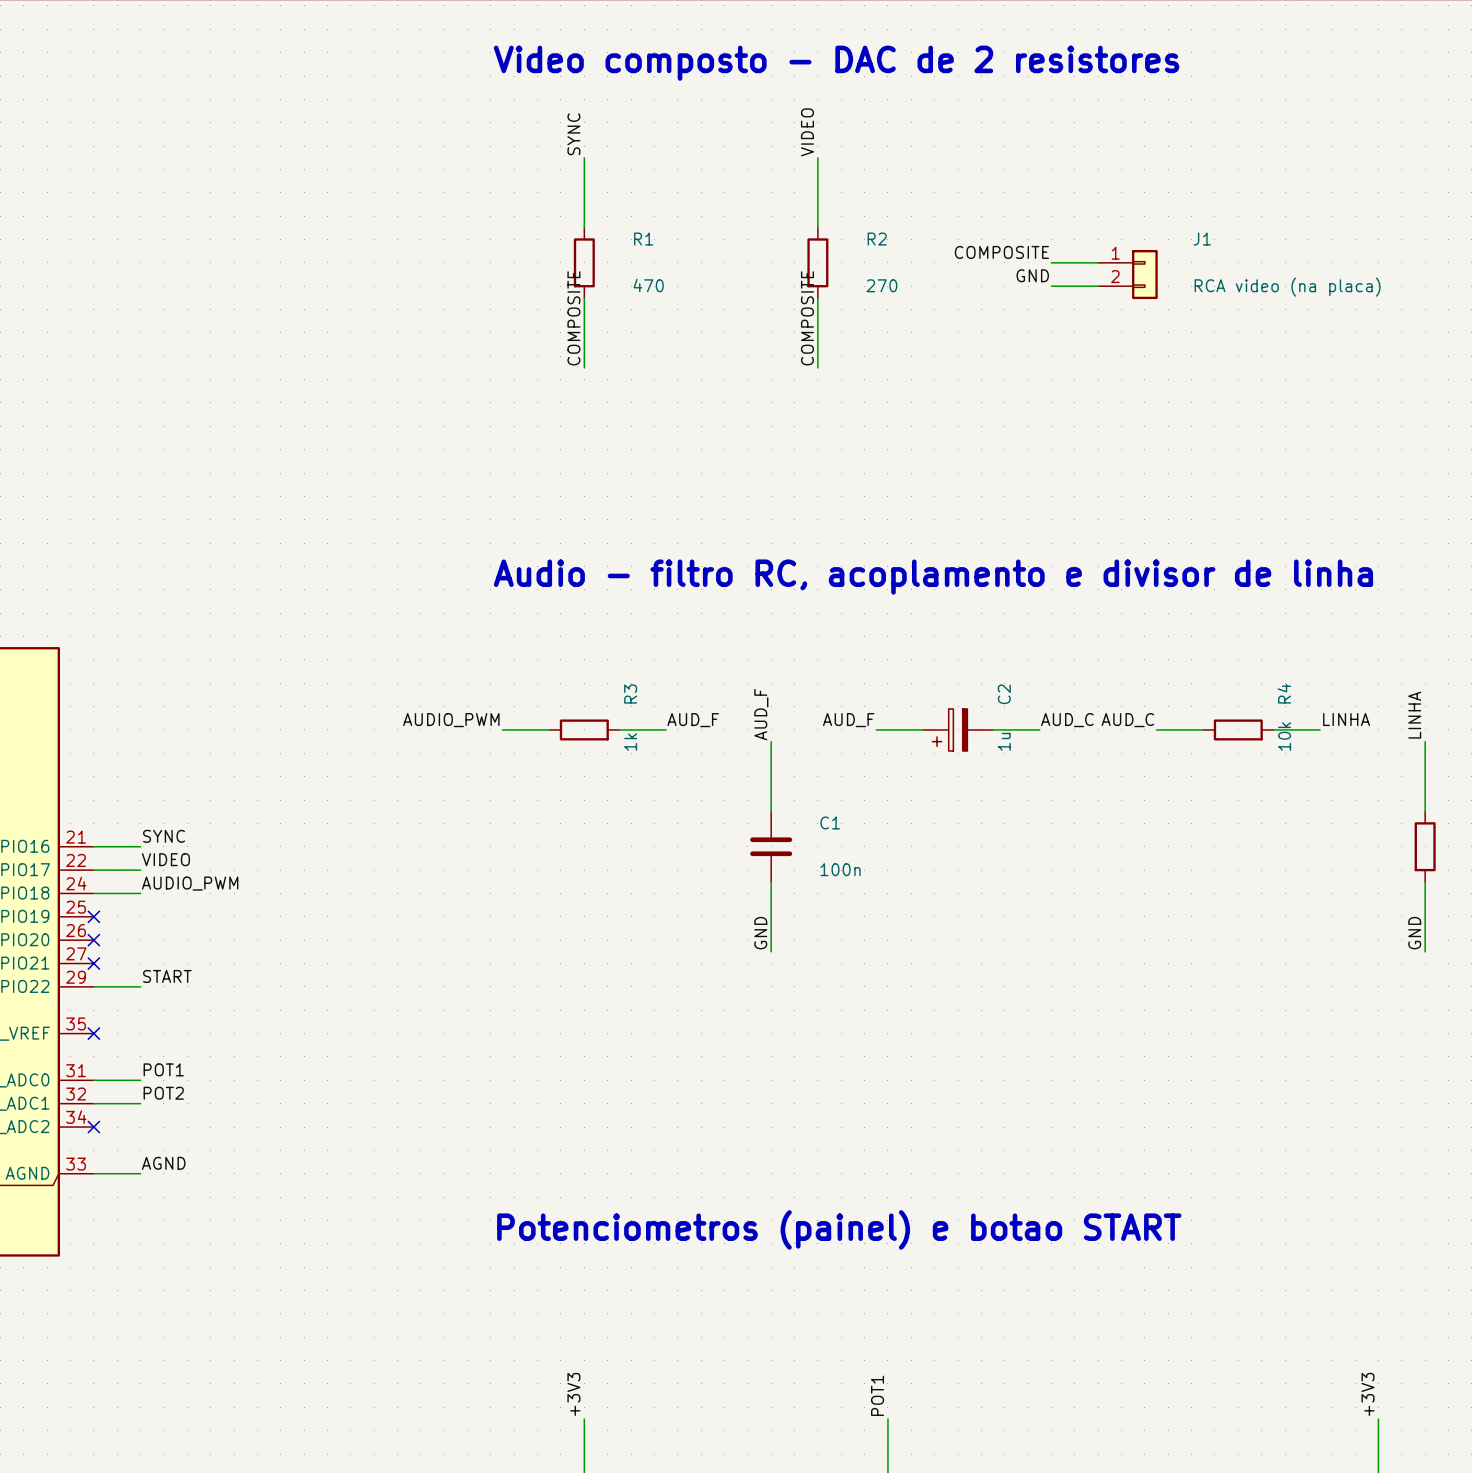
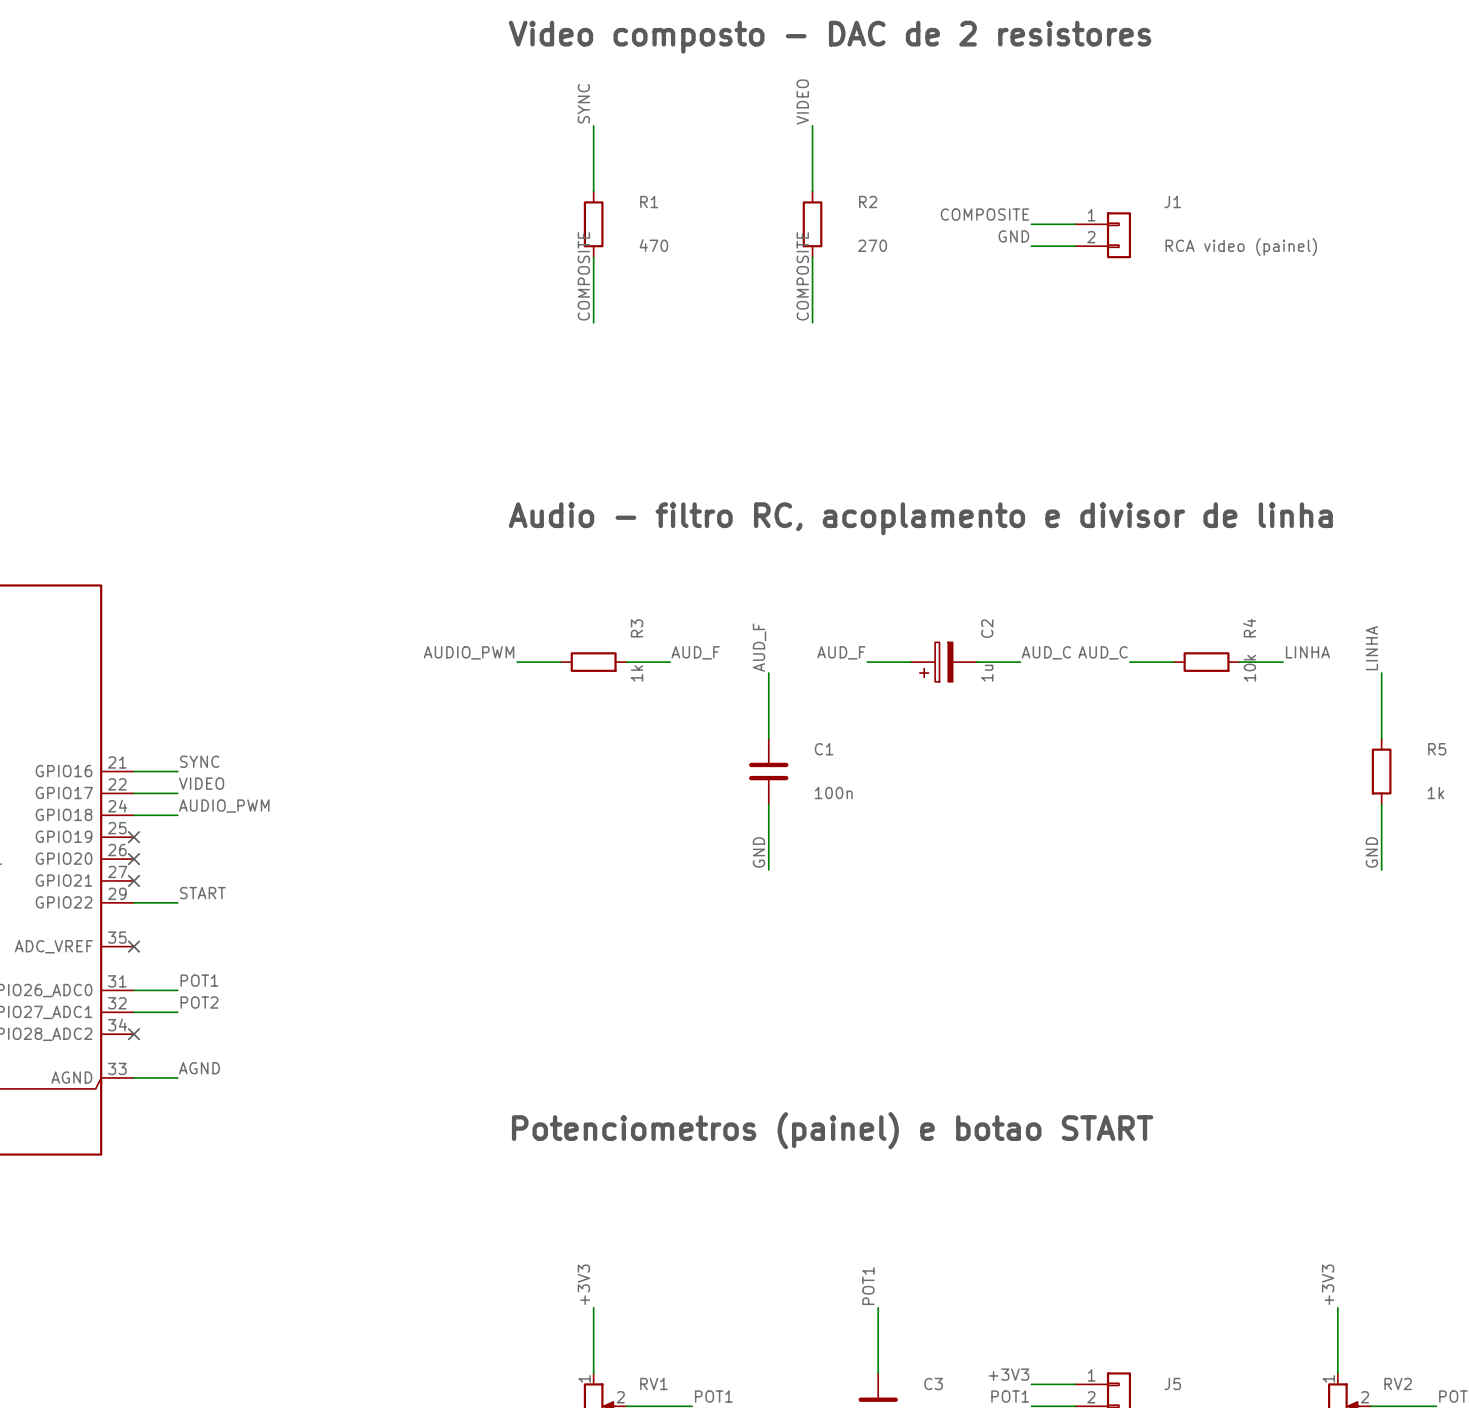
J1 value: RCA video (na placa) (1287, 287) -> RCA video (painel) (1241, 247)

